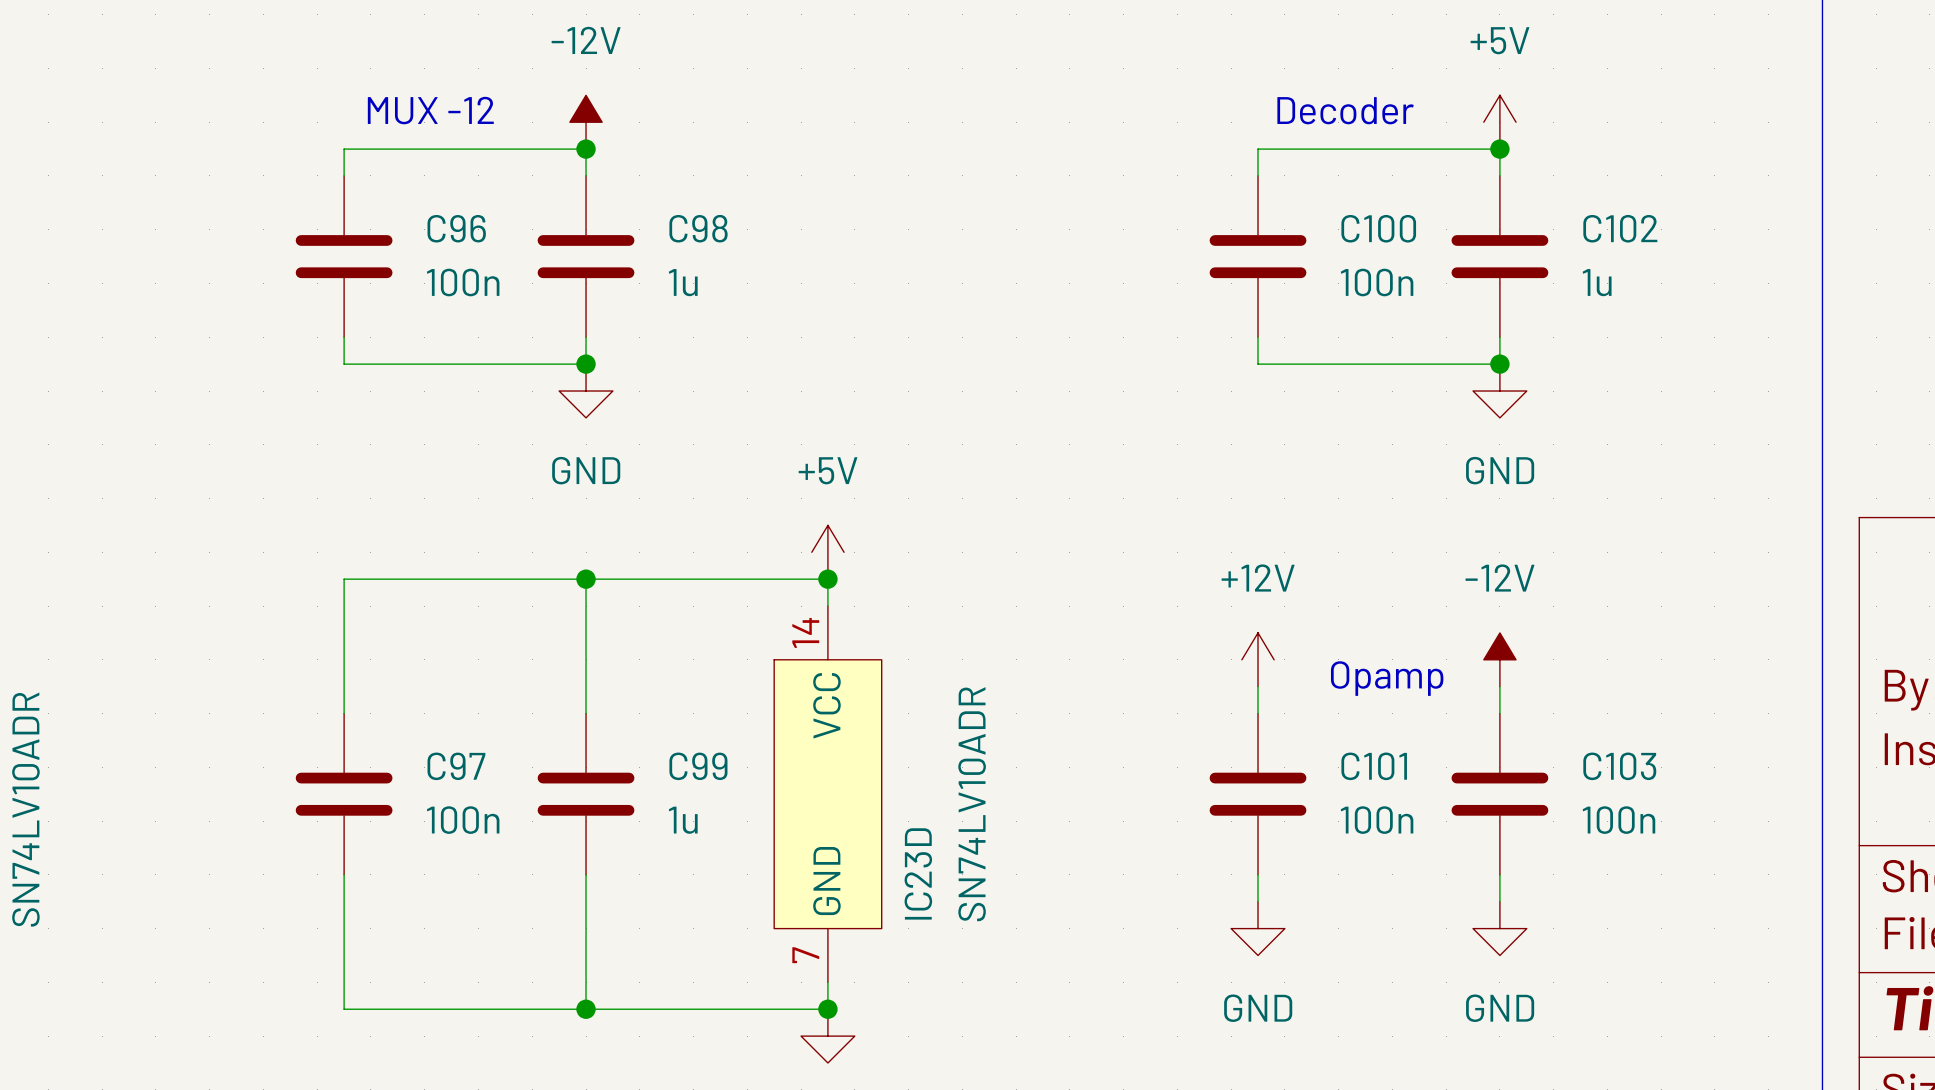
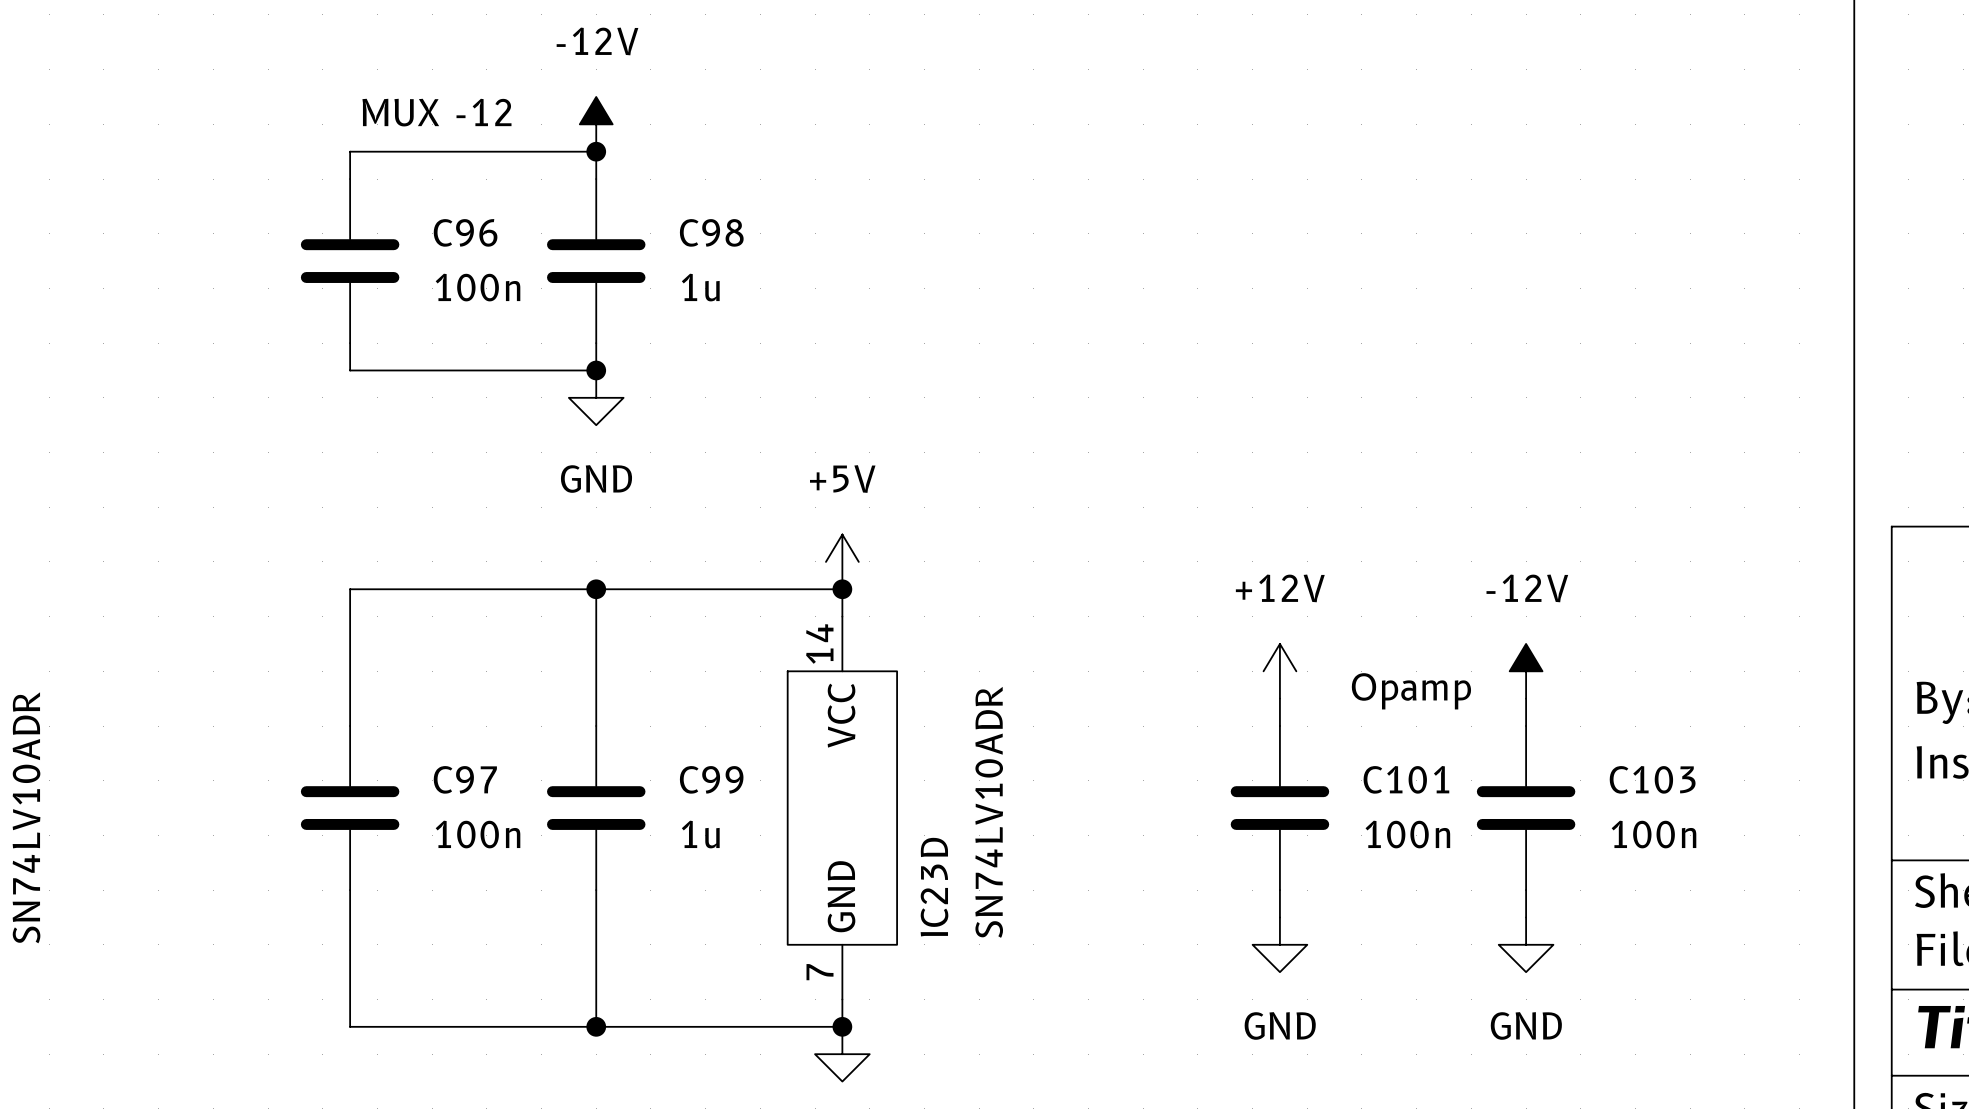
text: Decoder (1345, 110) -> none
power symbol: +5V (1499, 122) -> none
junction: (1499, 149) -> none
wire: (1258, 175) (1258, 149) (1499, 149) (1499, 175) -> none
C100: 100n (1258, 256) -> none
C102: 1u (1499, 256) -> none
wire: (1258, 337) (1258, 364) (1499, 364) (1499, 337) -> none
junction: (1499, 364) -> none
power symbol: GND (1499, 391) -> none

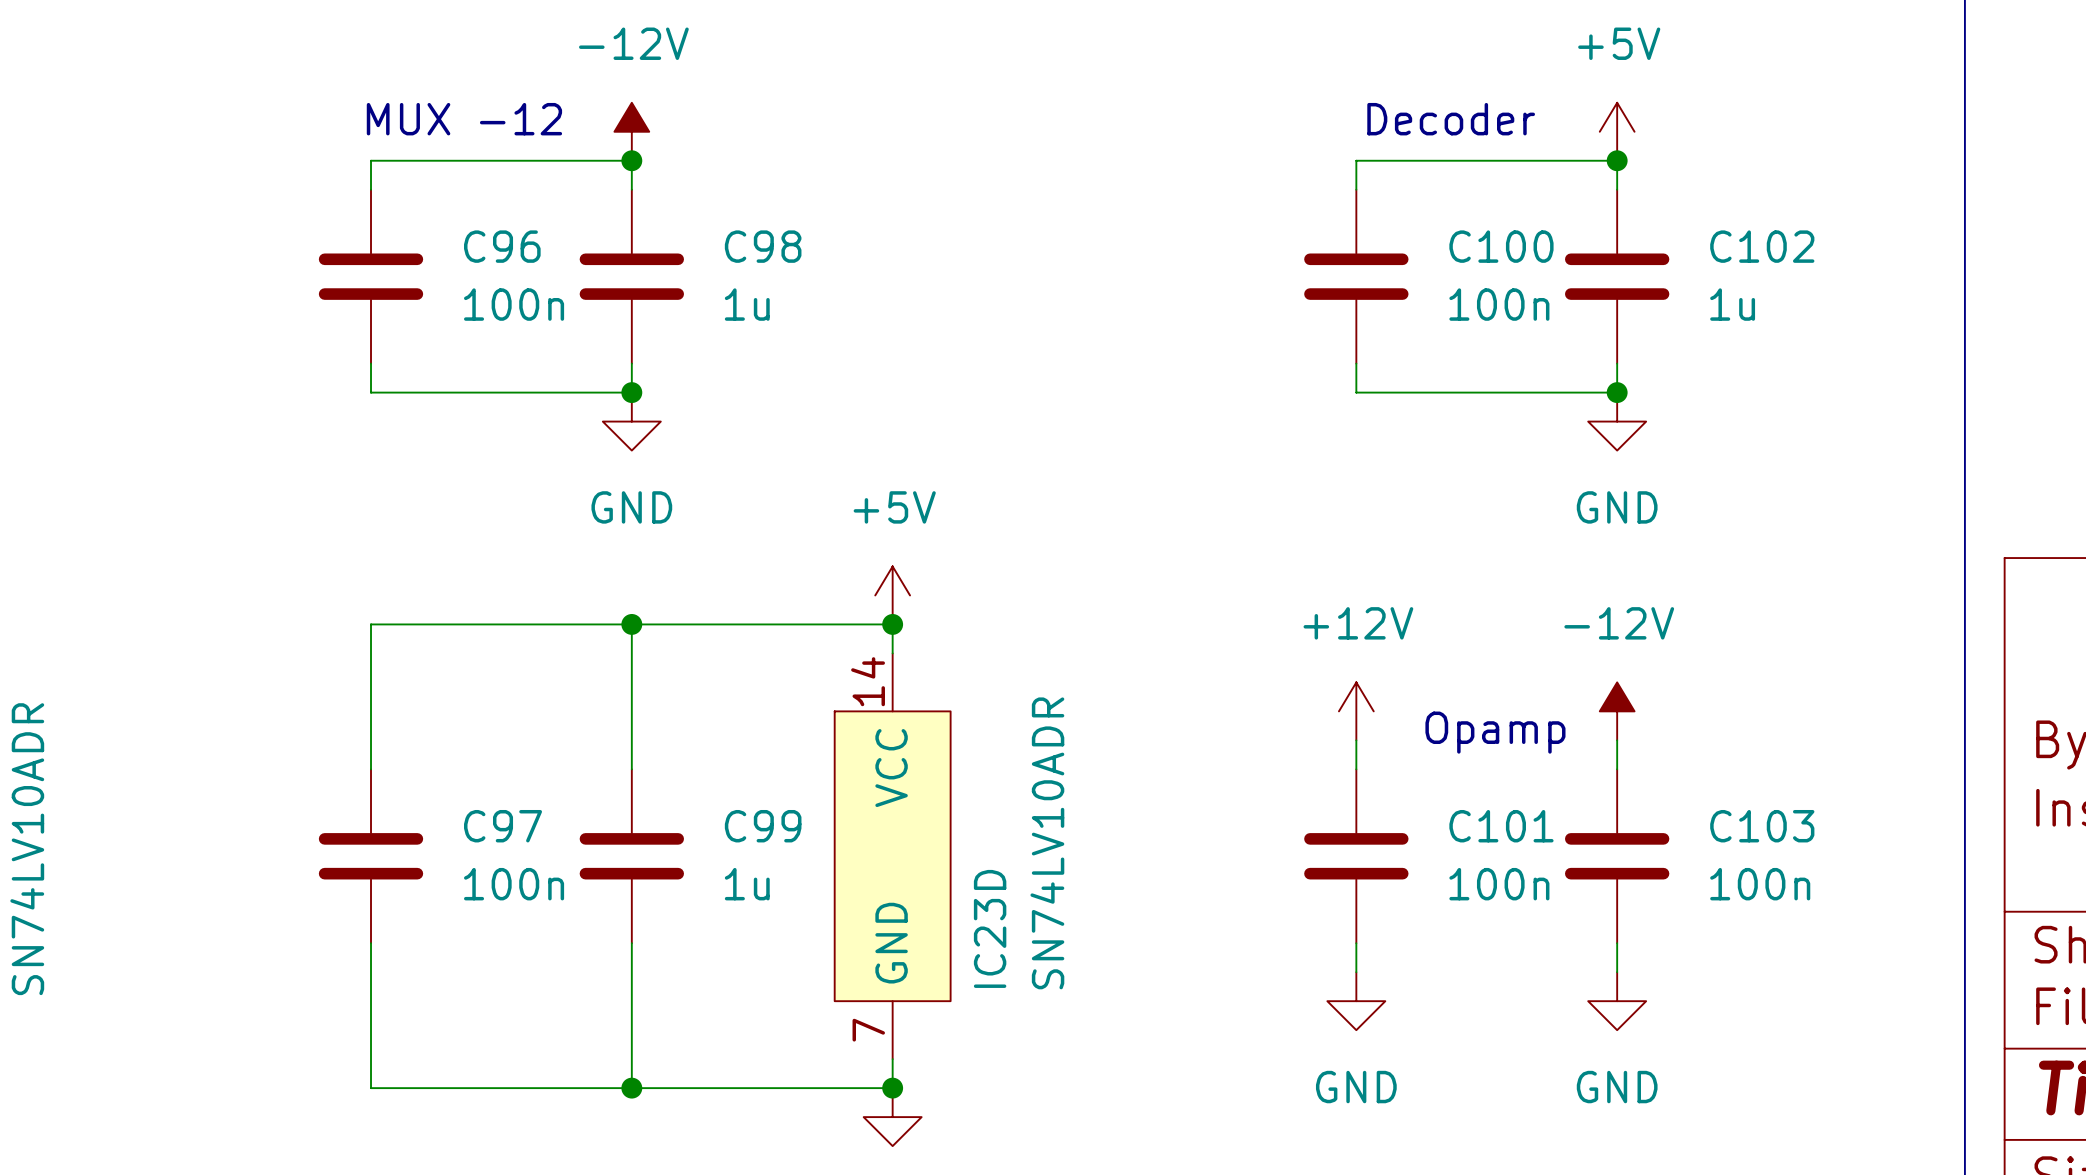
text: none -> Decoder (1451, 119)
power symbol: none -> +5V (1617, 131)
junction: none -> (1617, 160)
wire: none -> (1356, 189) (1356, 160) (1617, 160) (1617, 189)
C100: none -> 100n (1356, 276)
C102: none -> 1u (1617, 276)
wire: none -> (1356, 363) (1356, 392) (1617, 392) (1617, 363)
junction: none -> (1617, 392)
power symbol: none -> GND (1617, 421)

